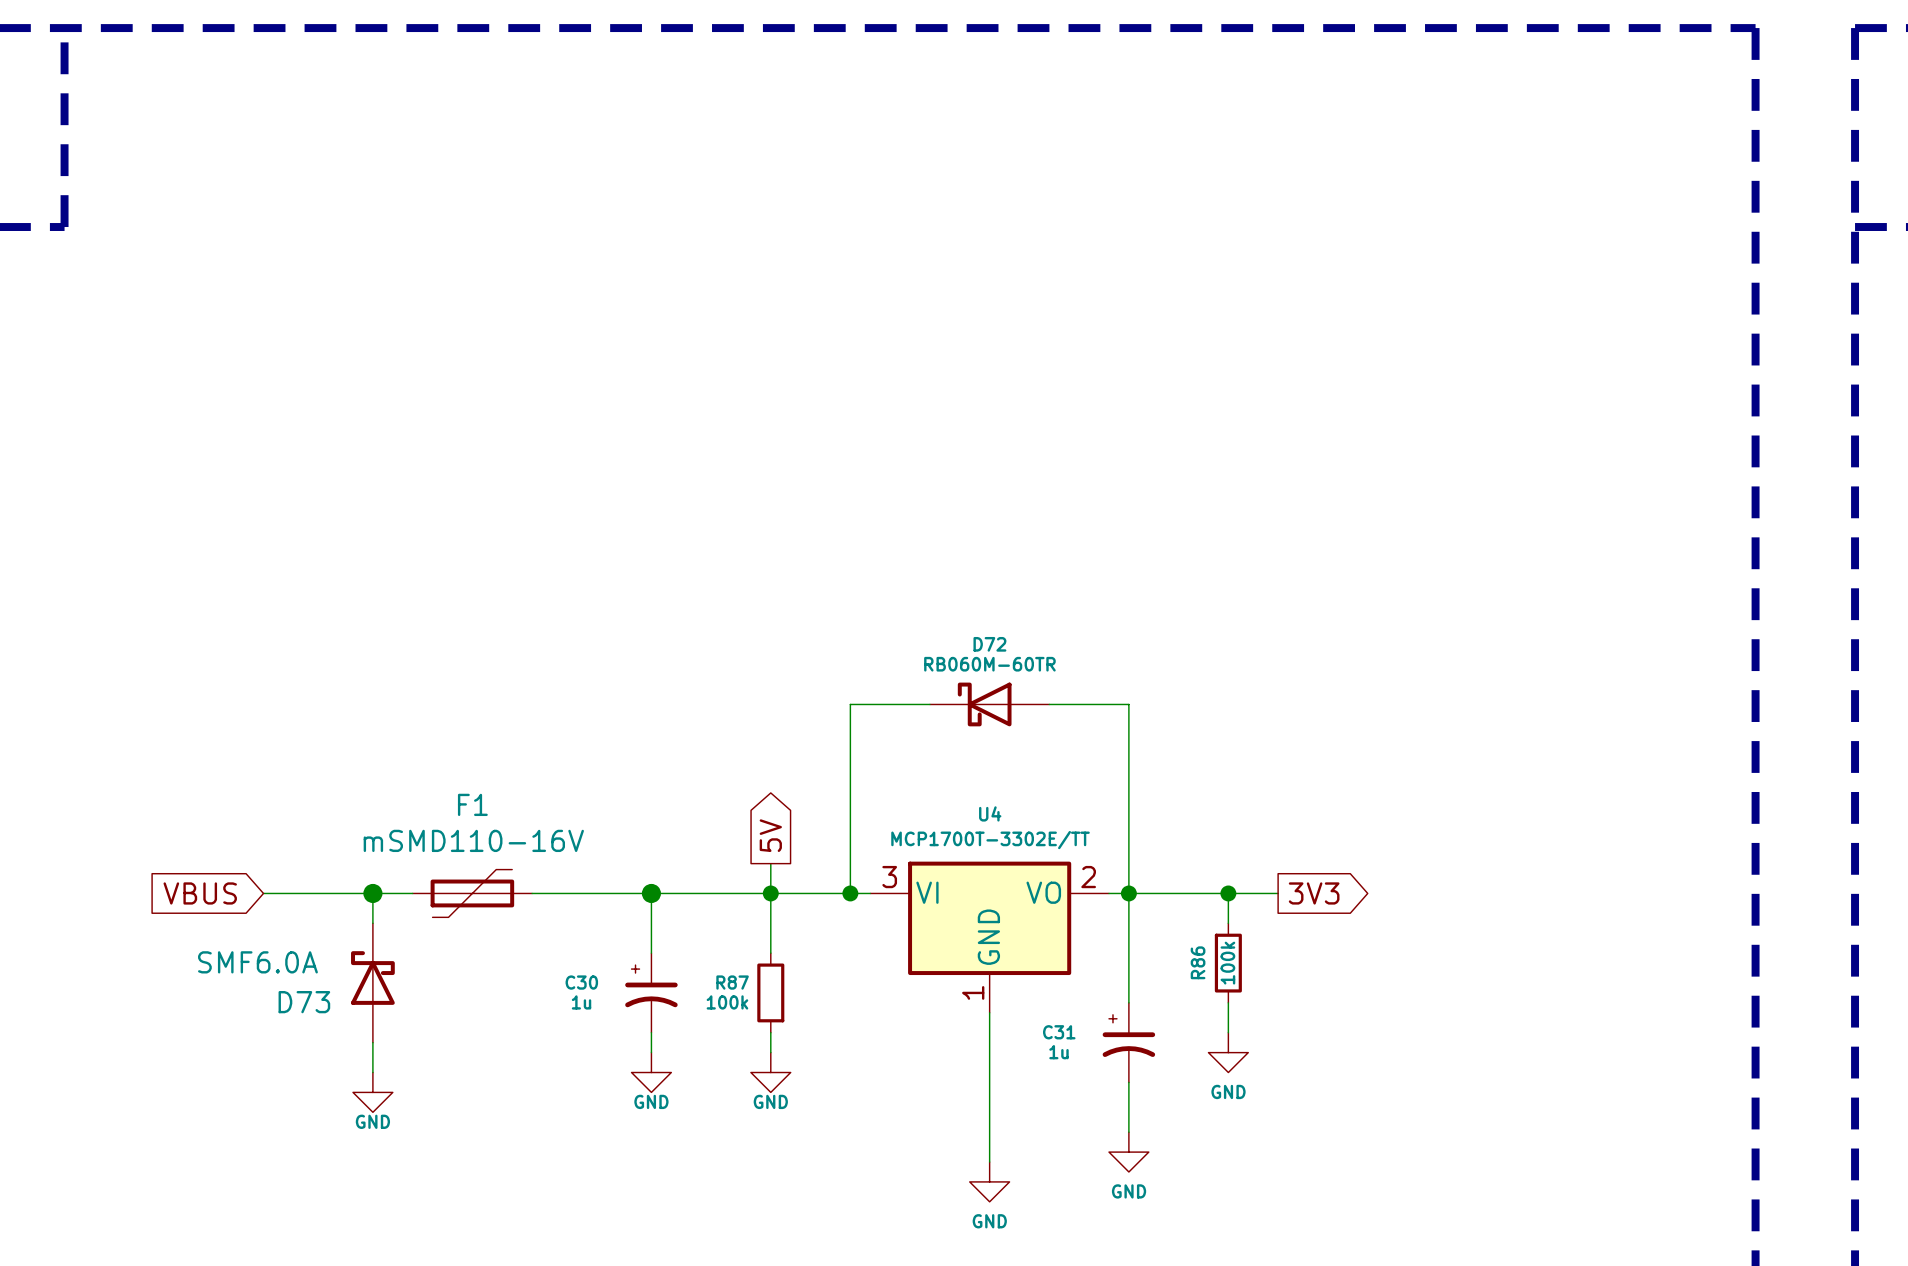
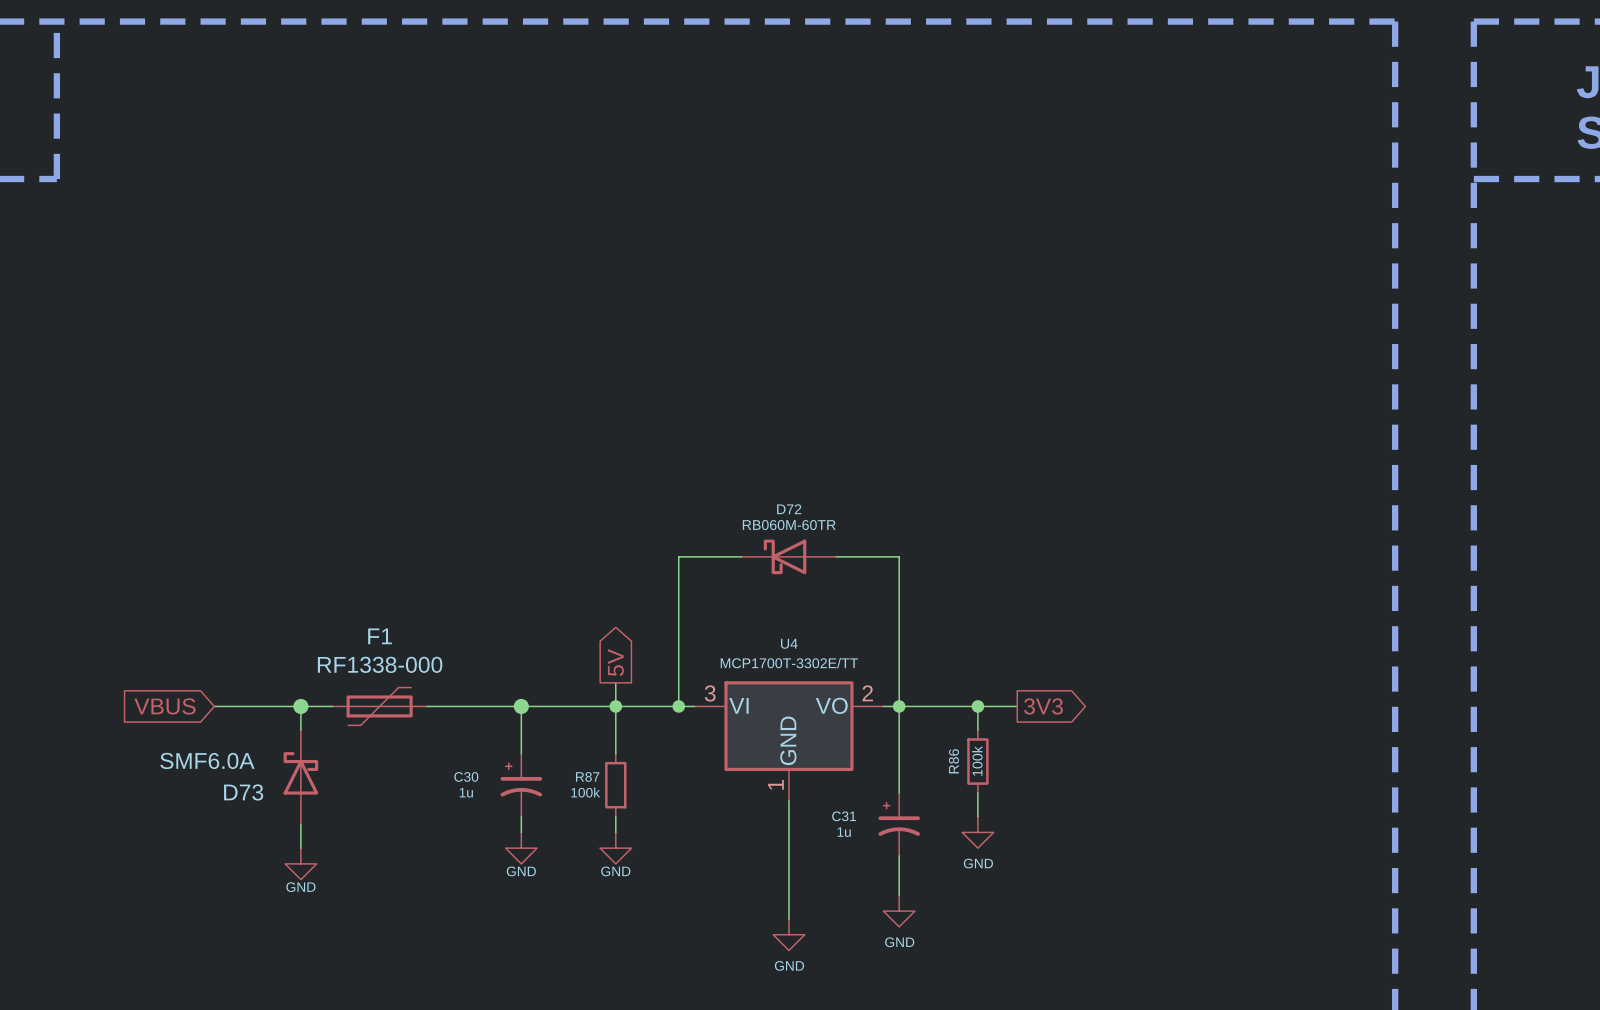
F1 value: mSMD110-16V (473, 840) -> RF1338-000 (380, 664)

